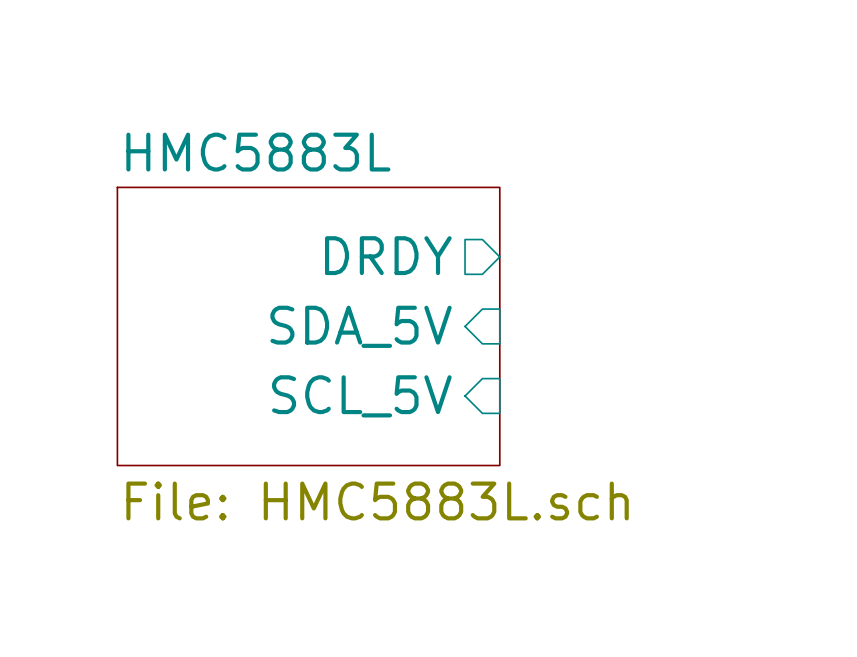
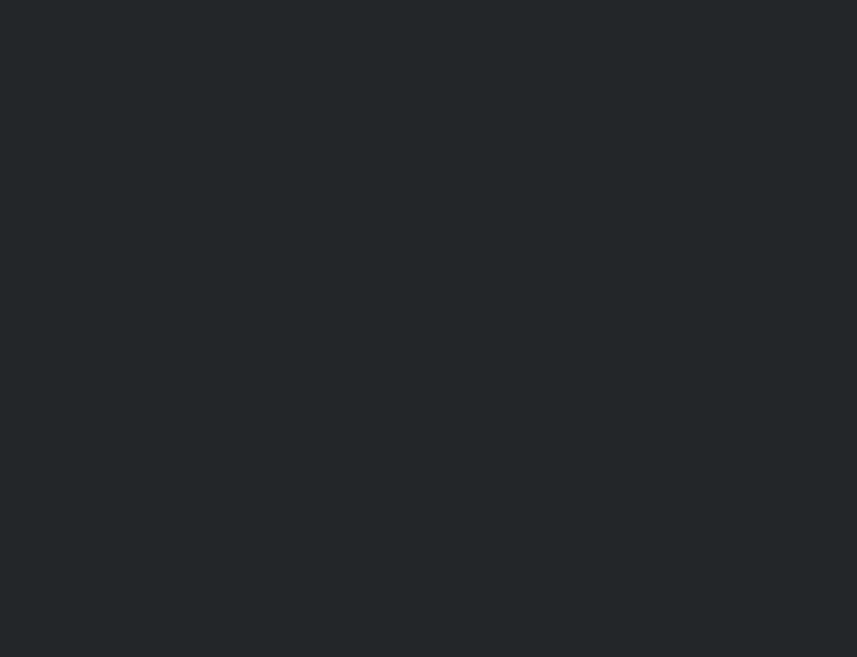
sheet pin: DRDY (388, 255) -> none
sheet HMC5883L: File: HMC5883L.sch (308, 326) -> none
sheet pin: SDA_5V (361, 326) -> none
sheet pin: SCL_5V (361, 396) -> none

